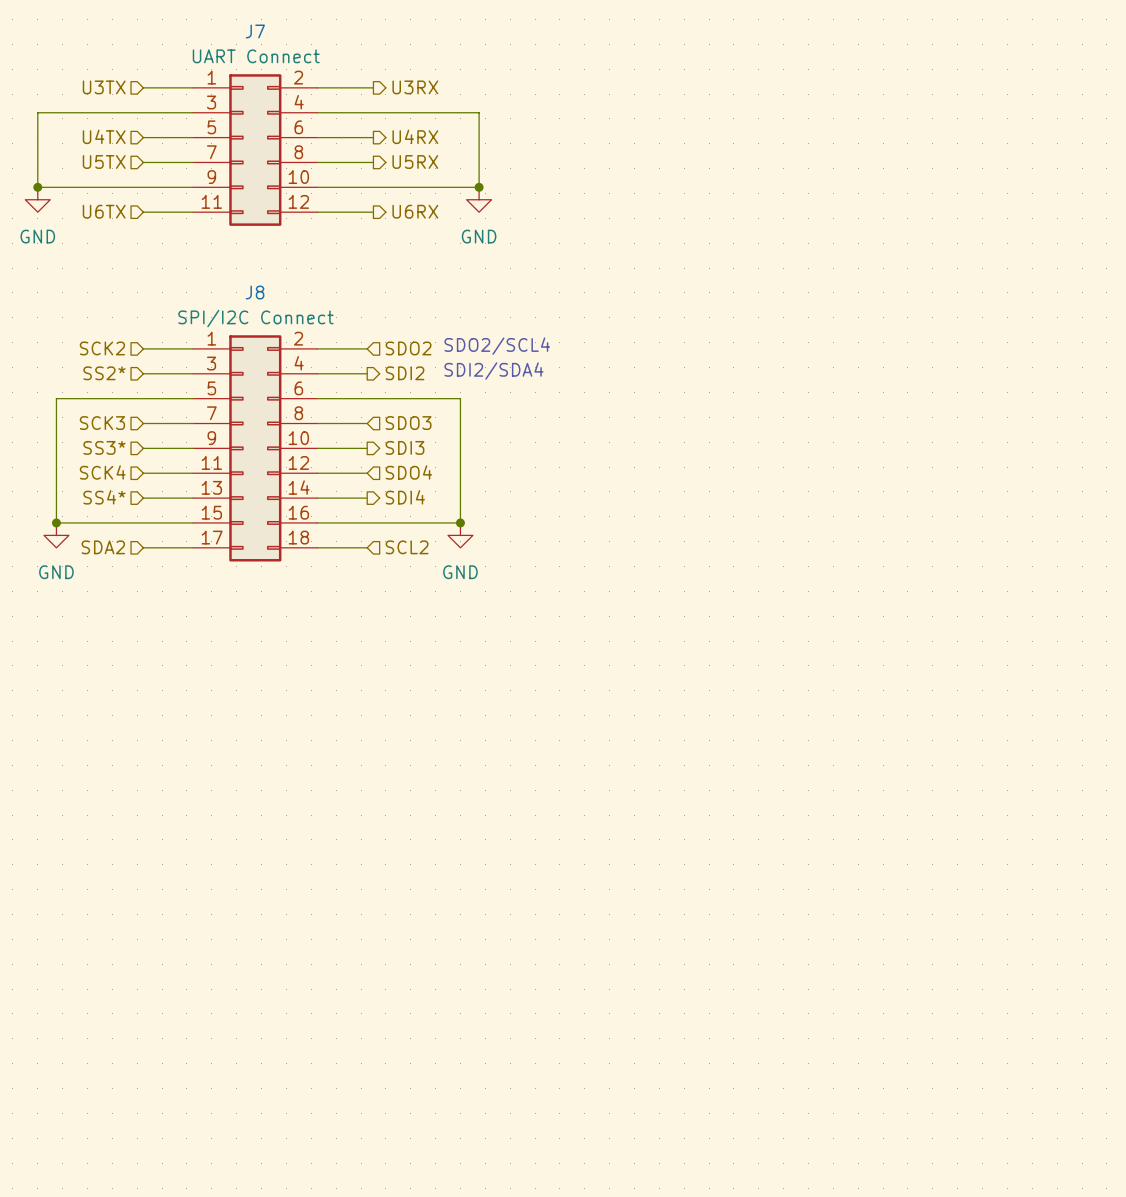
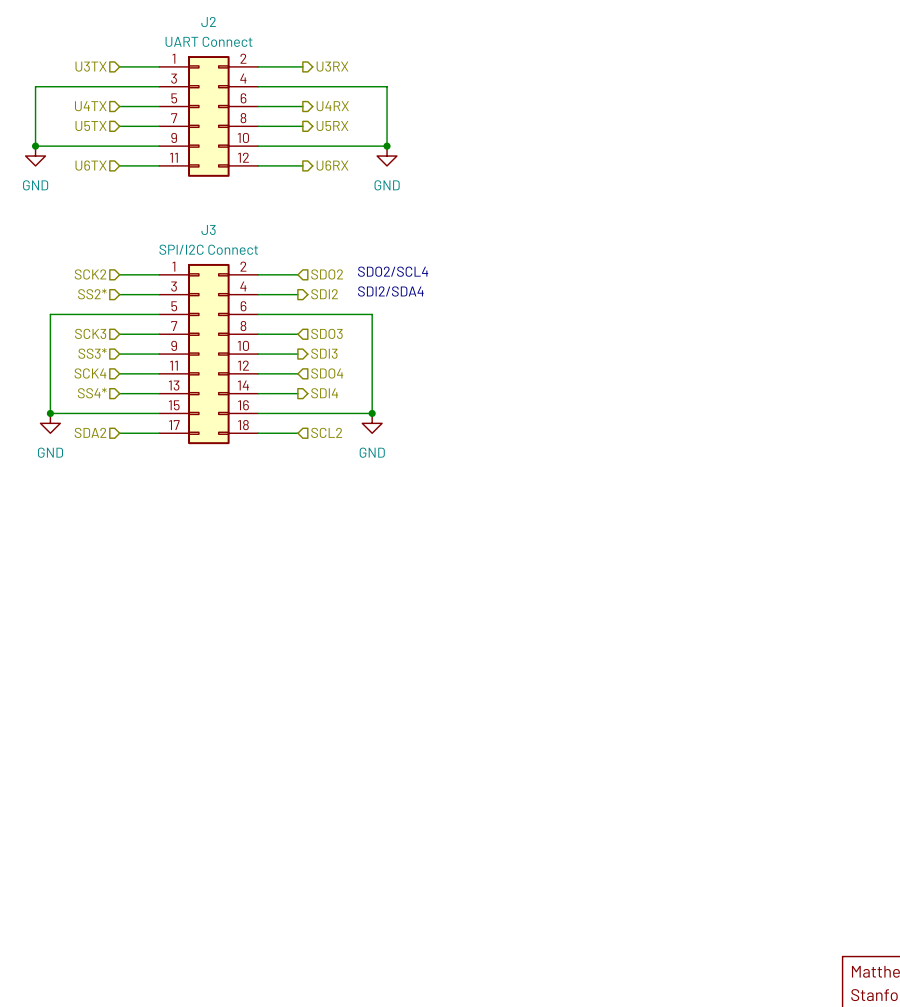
J7 name: J7 (255, 31) -> J2 (208, 22)
J8 name: J8 (255, 292) -> J3 (208, 229)

